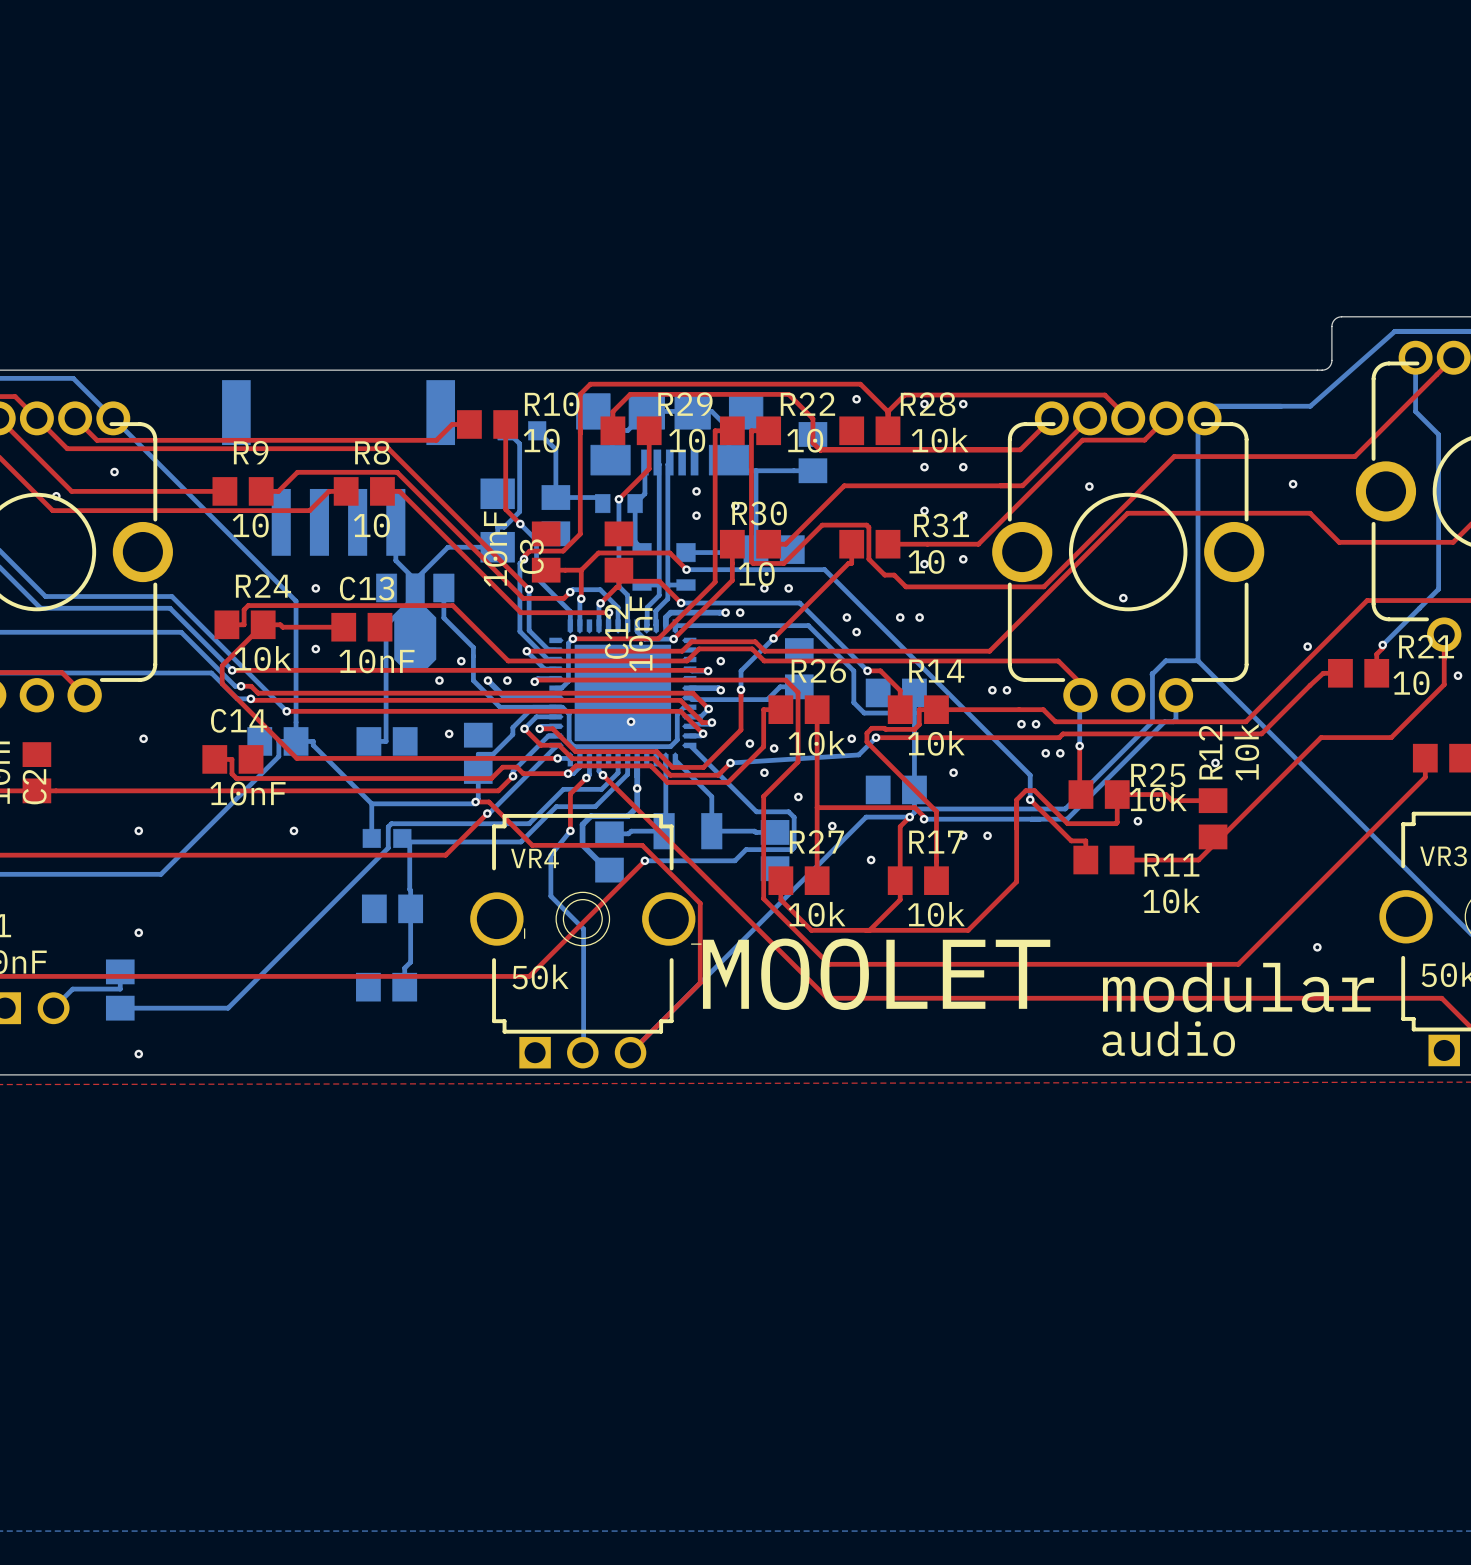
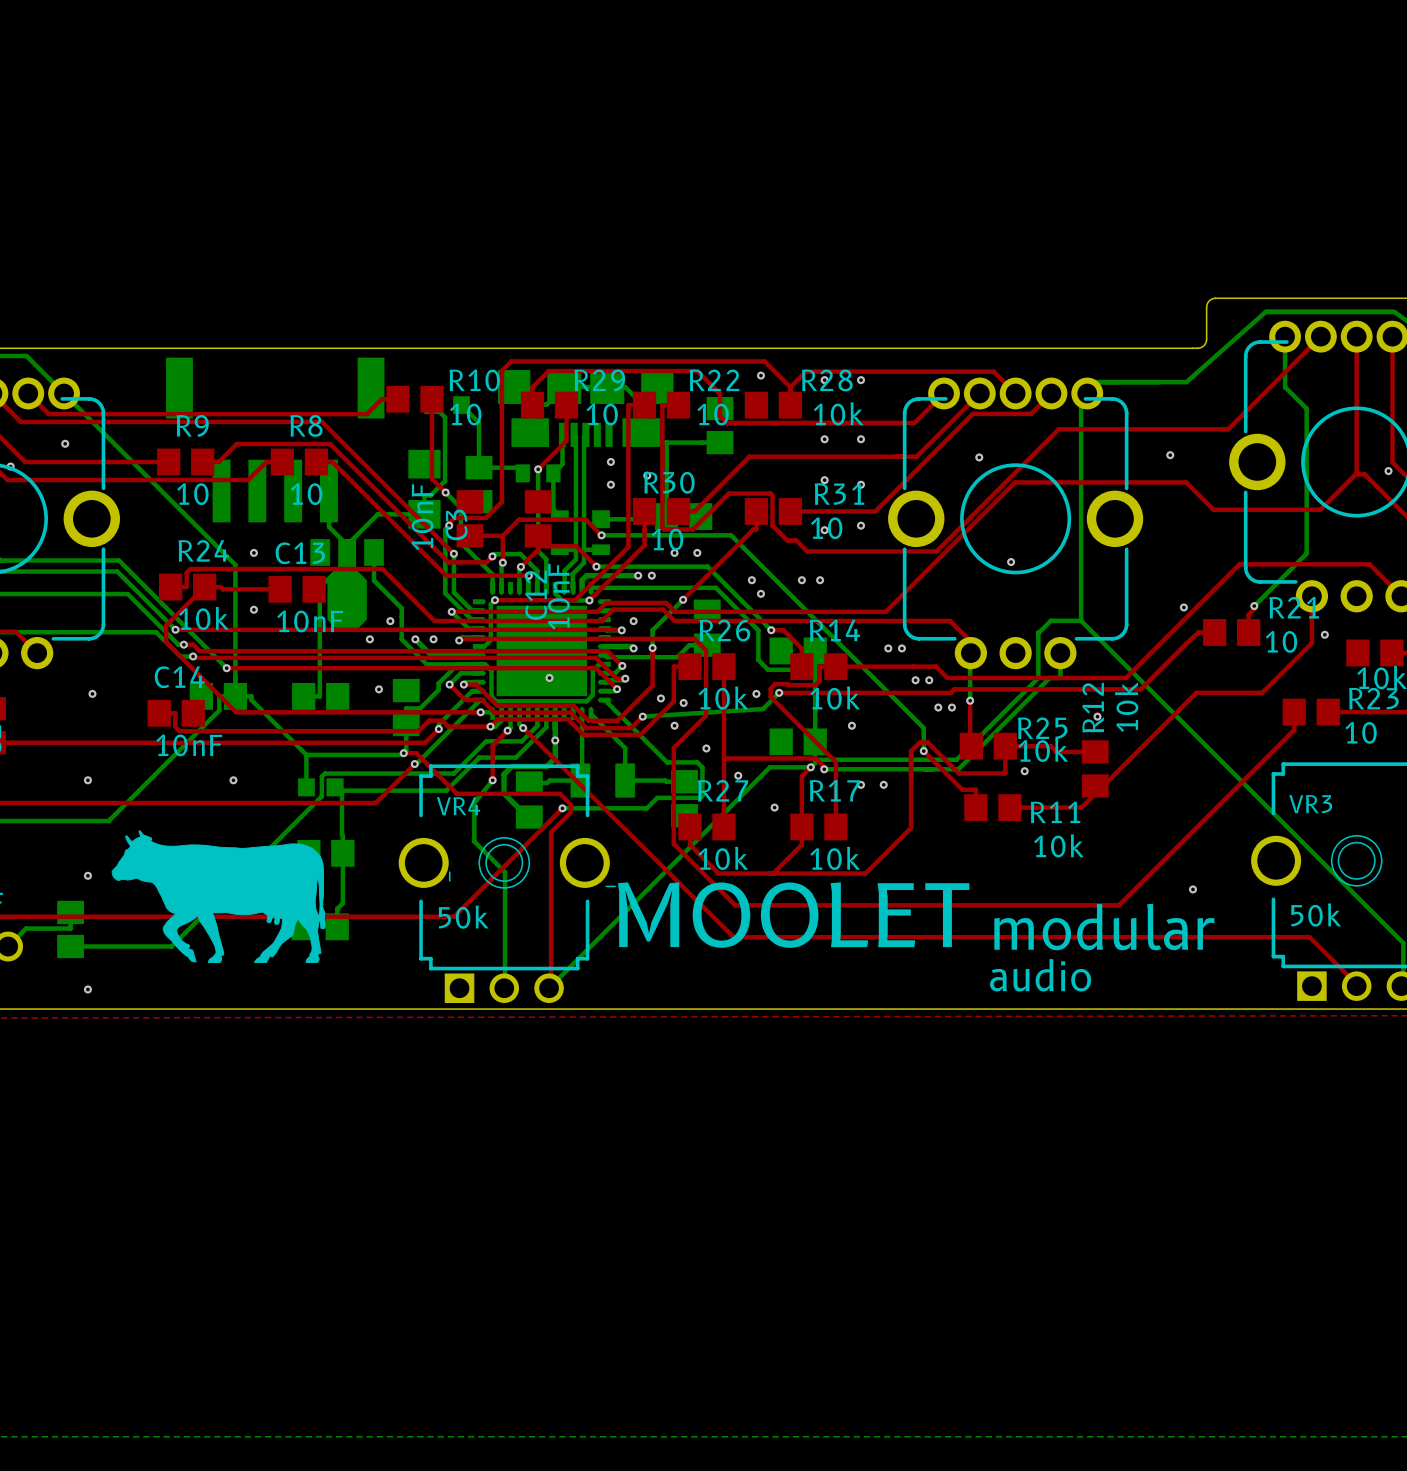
top track: (653, 857) (700, 903) (700, 983) (630, 1052) -> (570, 804) (570, 812) (551, 832) (551, 985)
drawing: none -> [111, 830, 326, 963]

